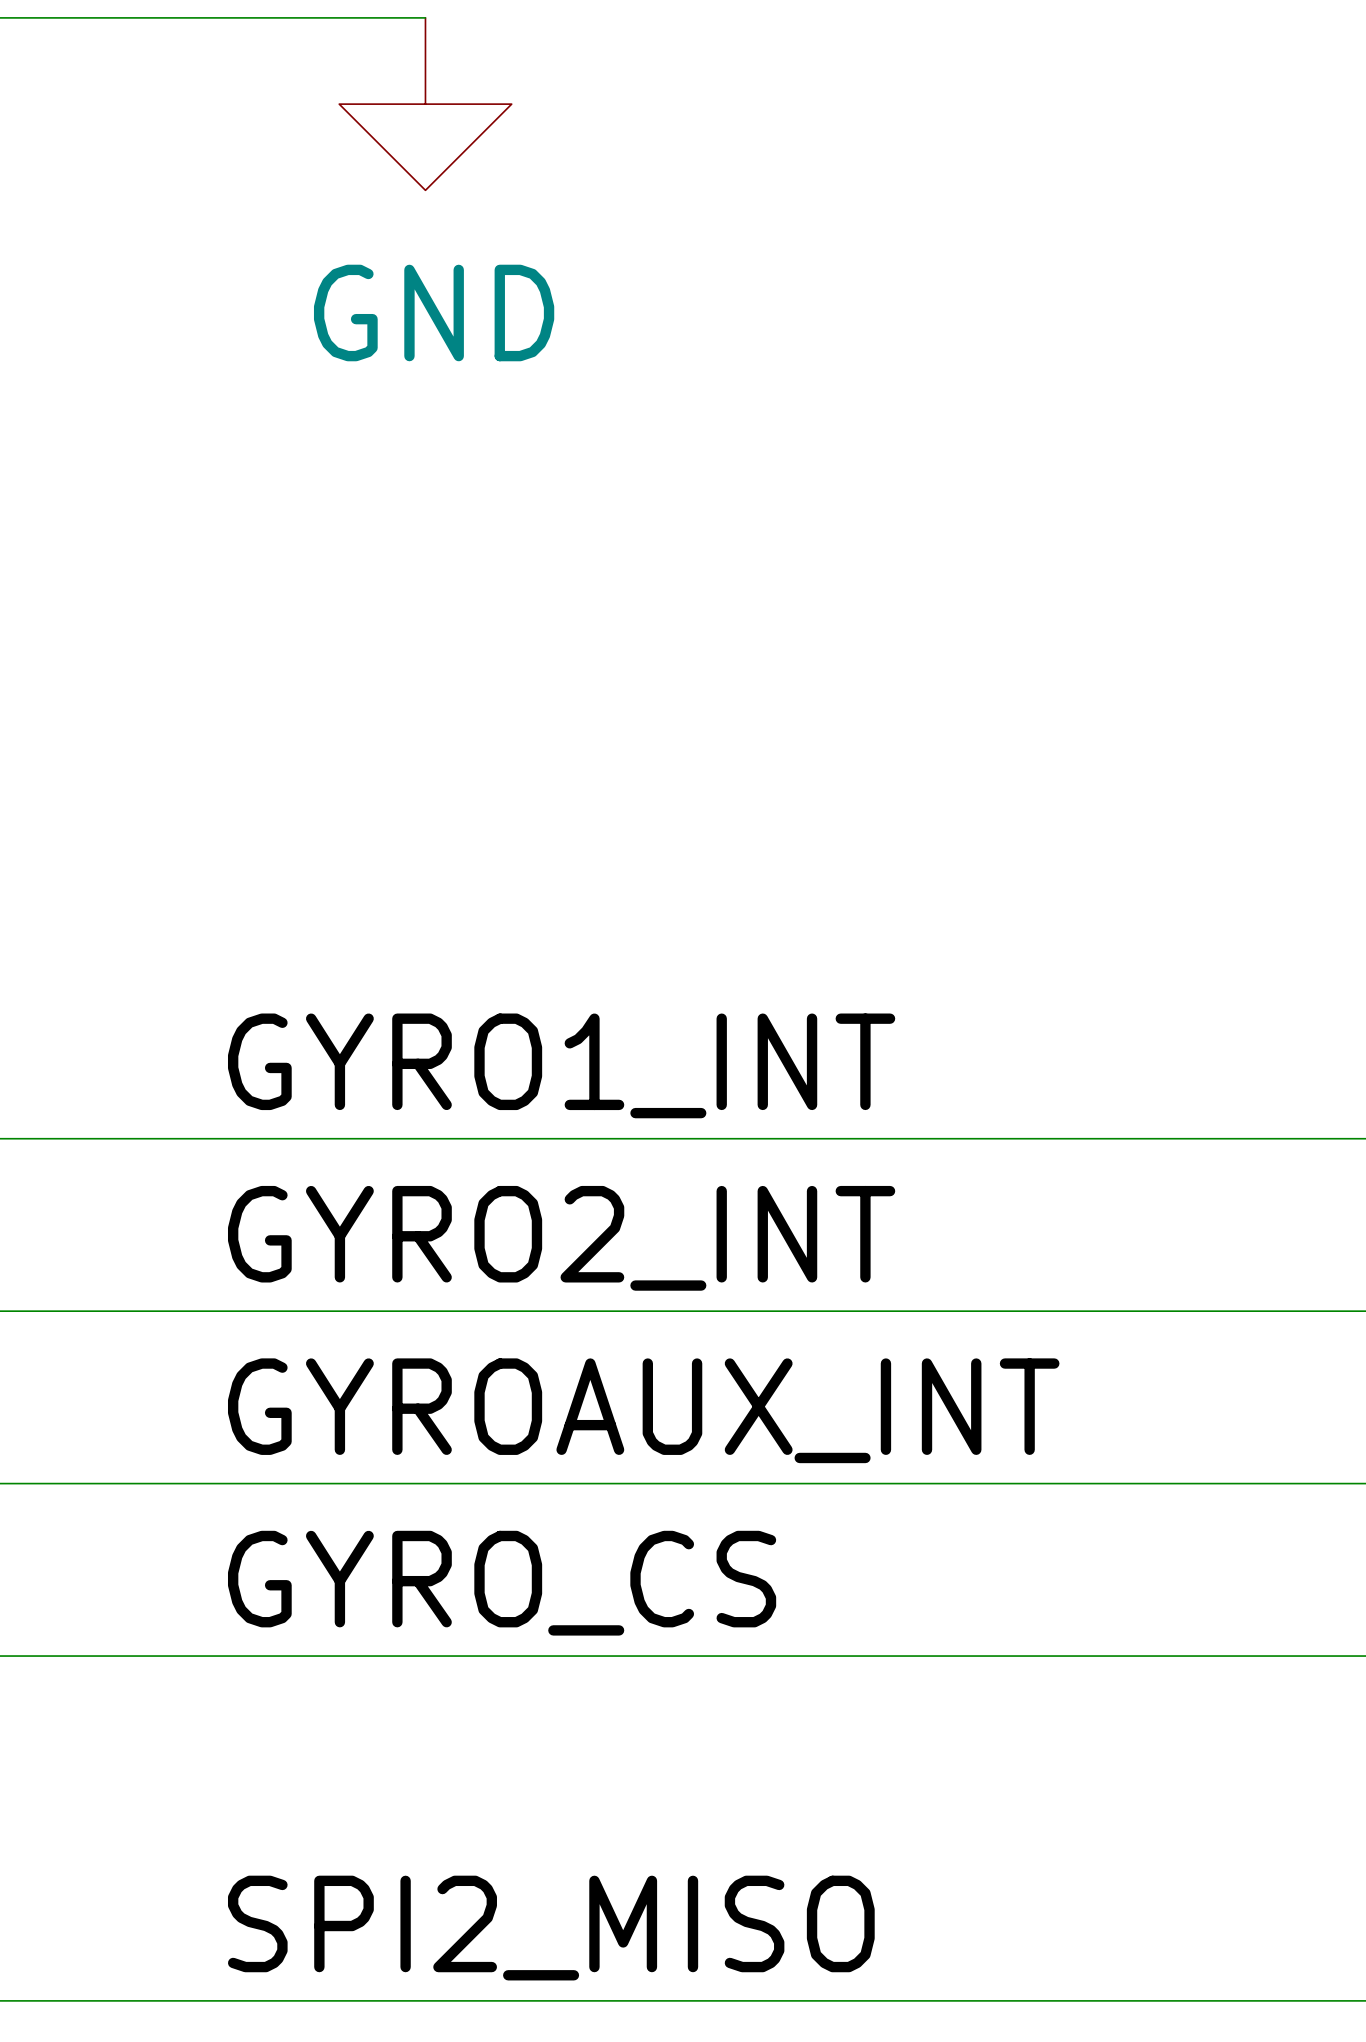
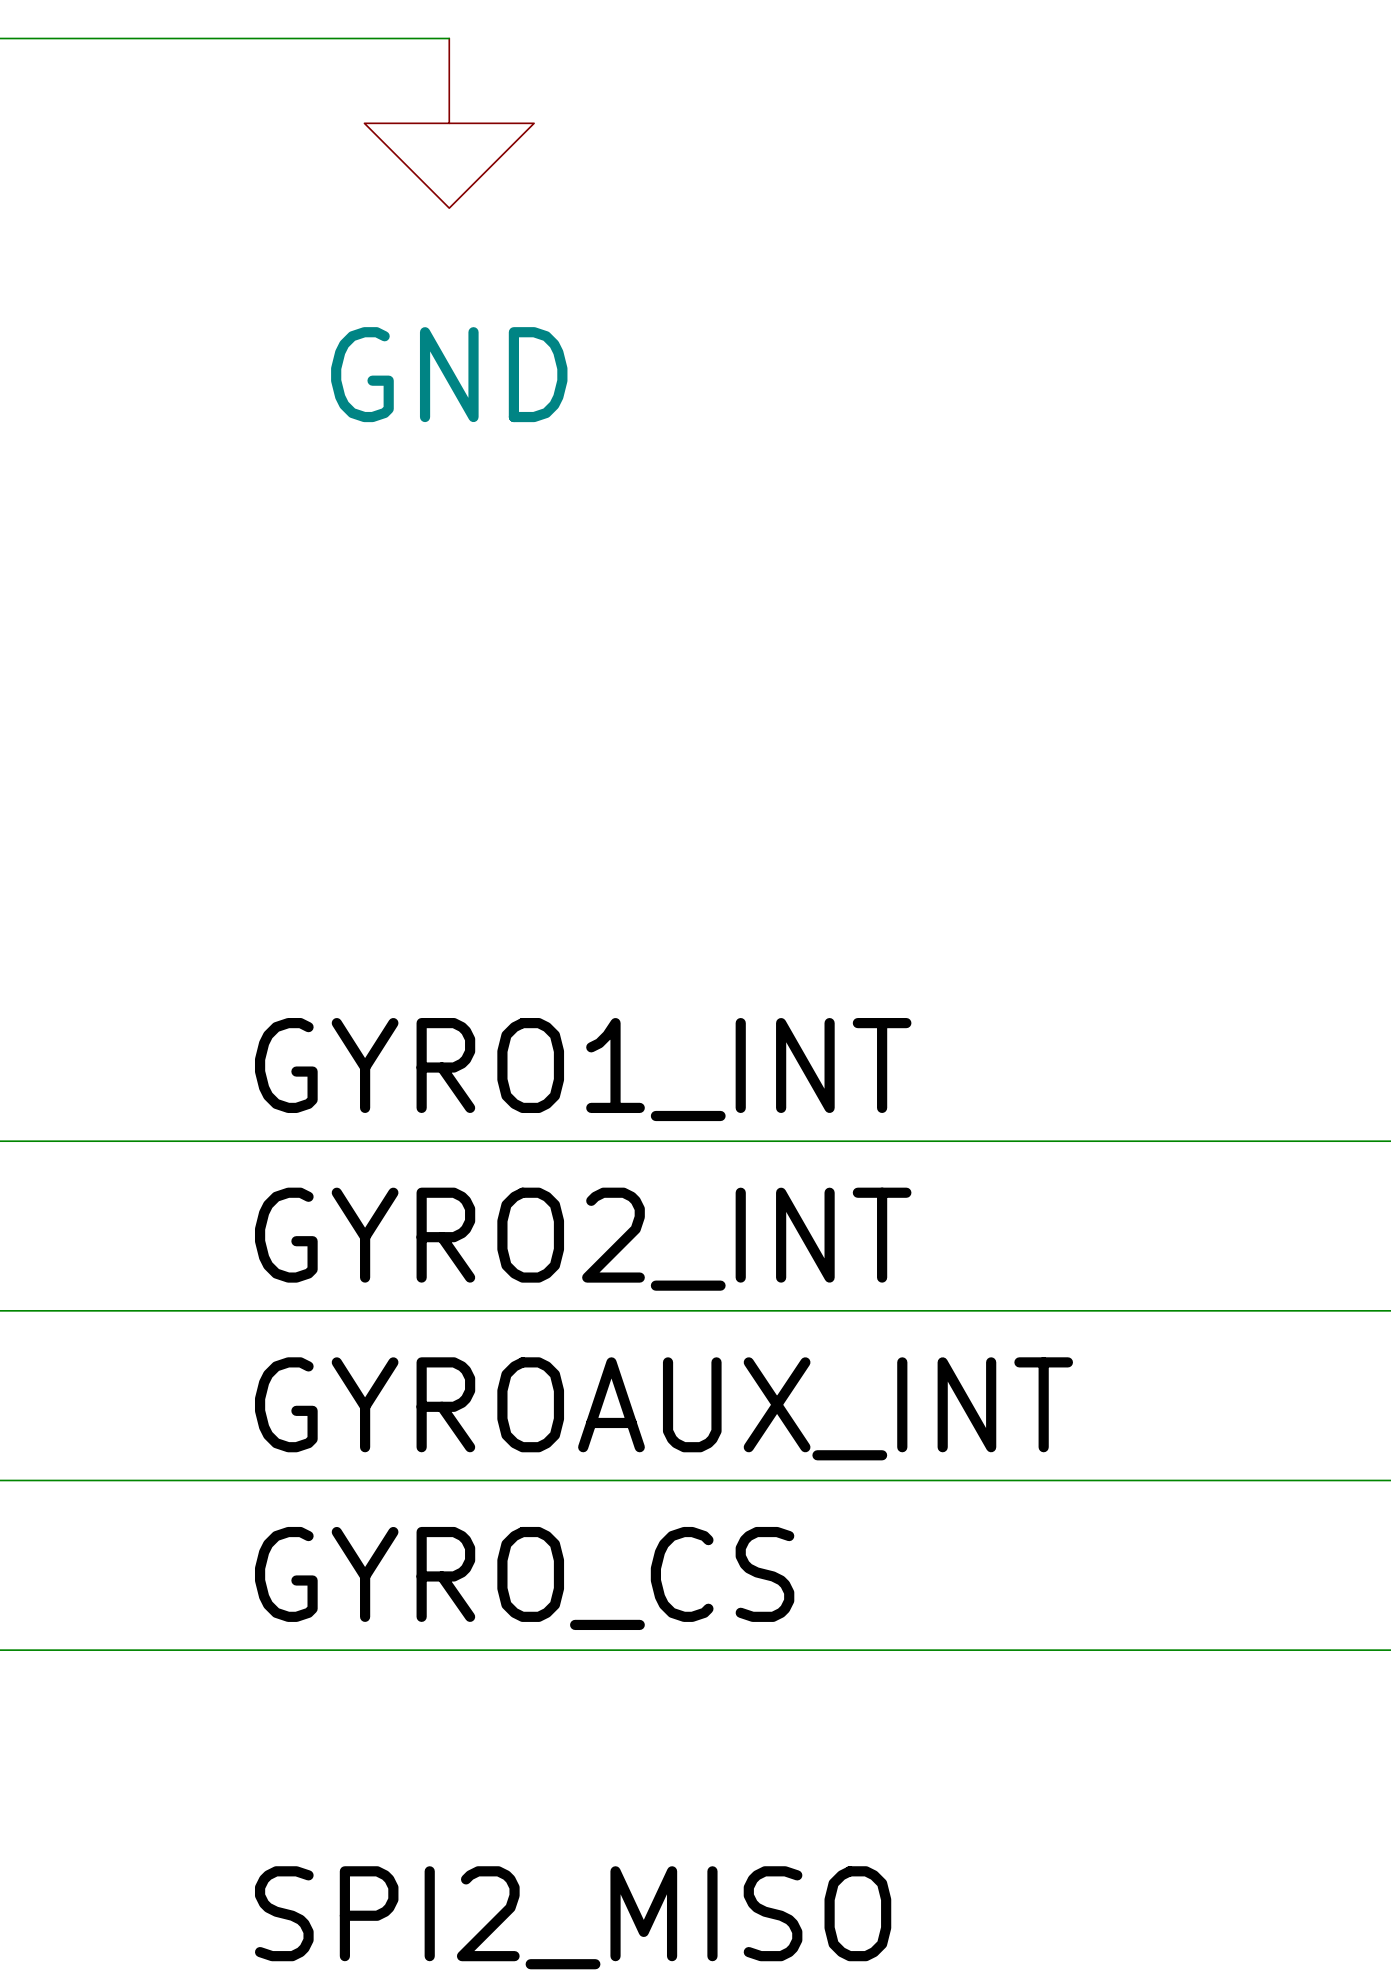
power symbol text position: GND (434, 312) -> GND (449, 374)

